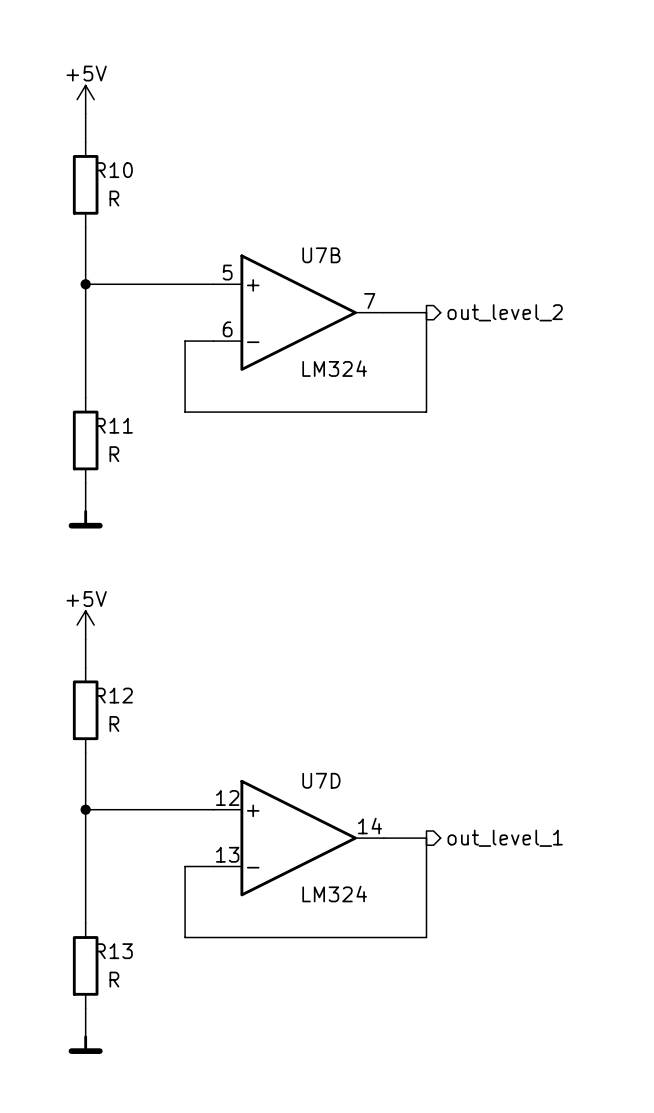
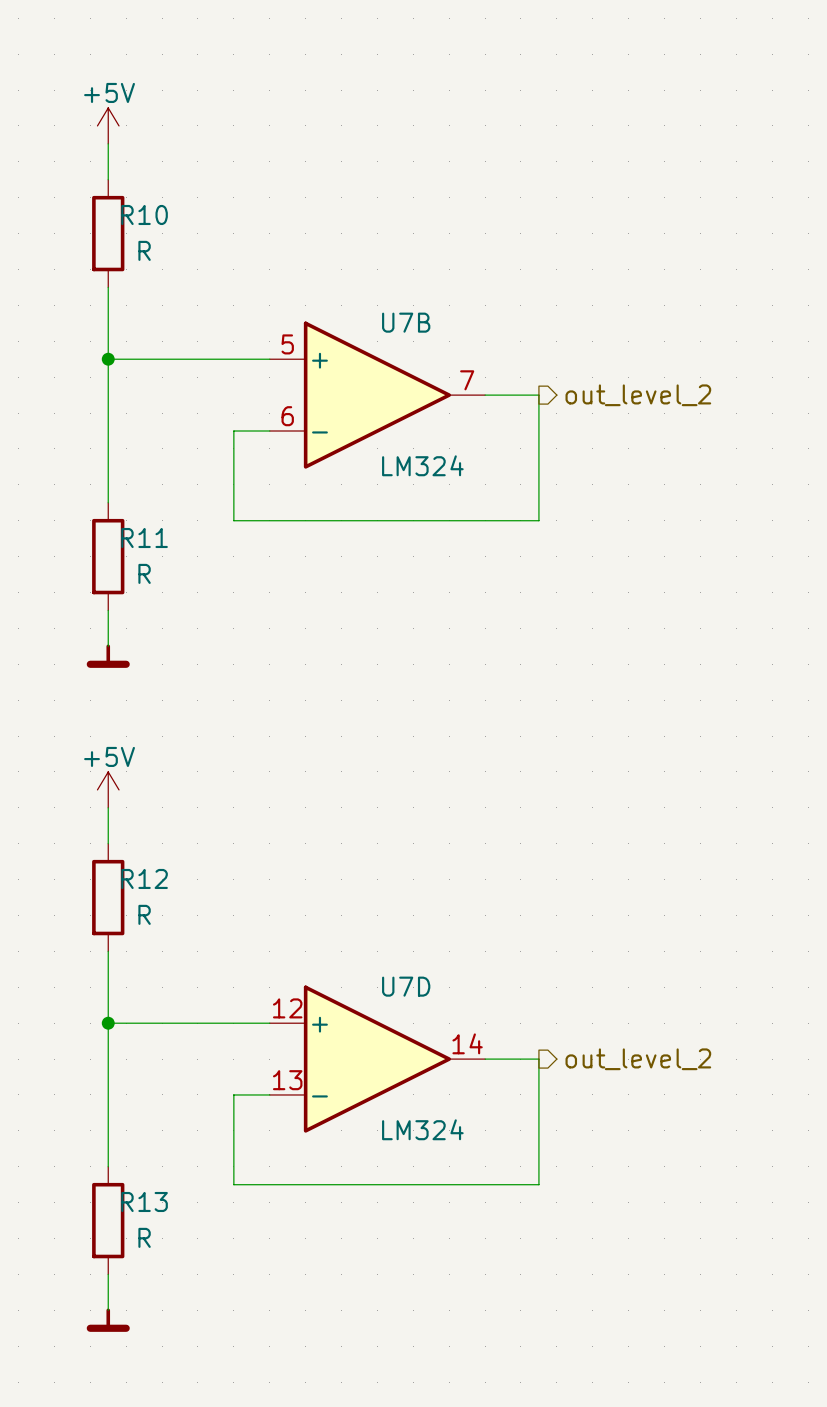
hierarchical label: out_level_1 (505, 838) -> out_level_2 (638, 1059)

